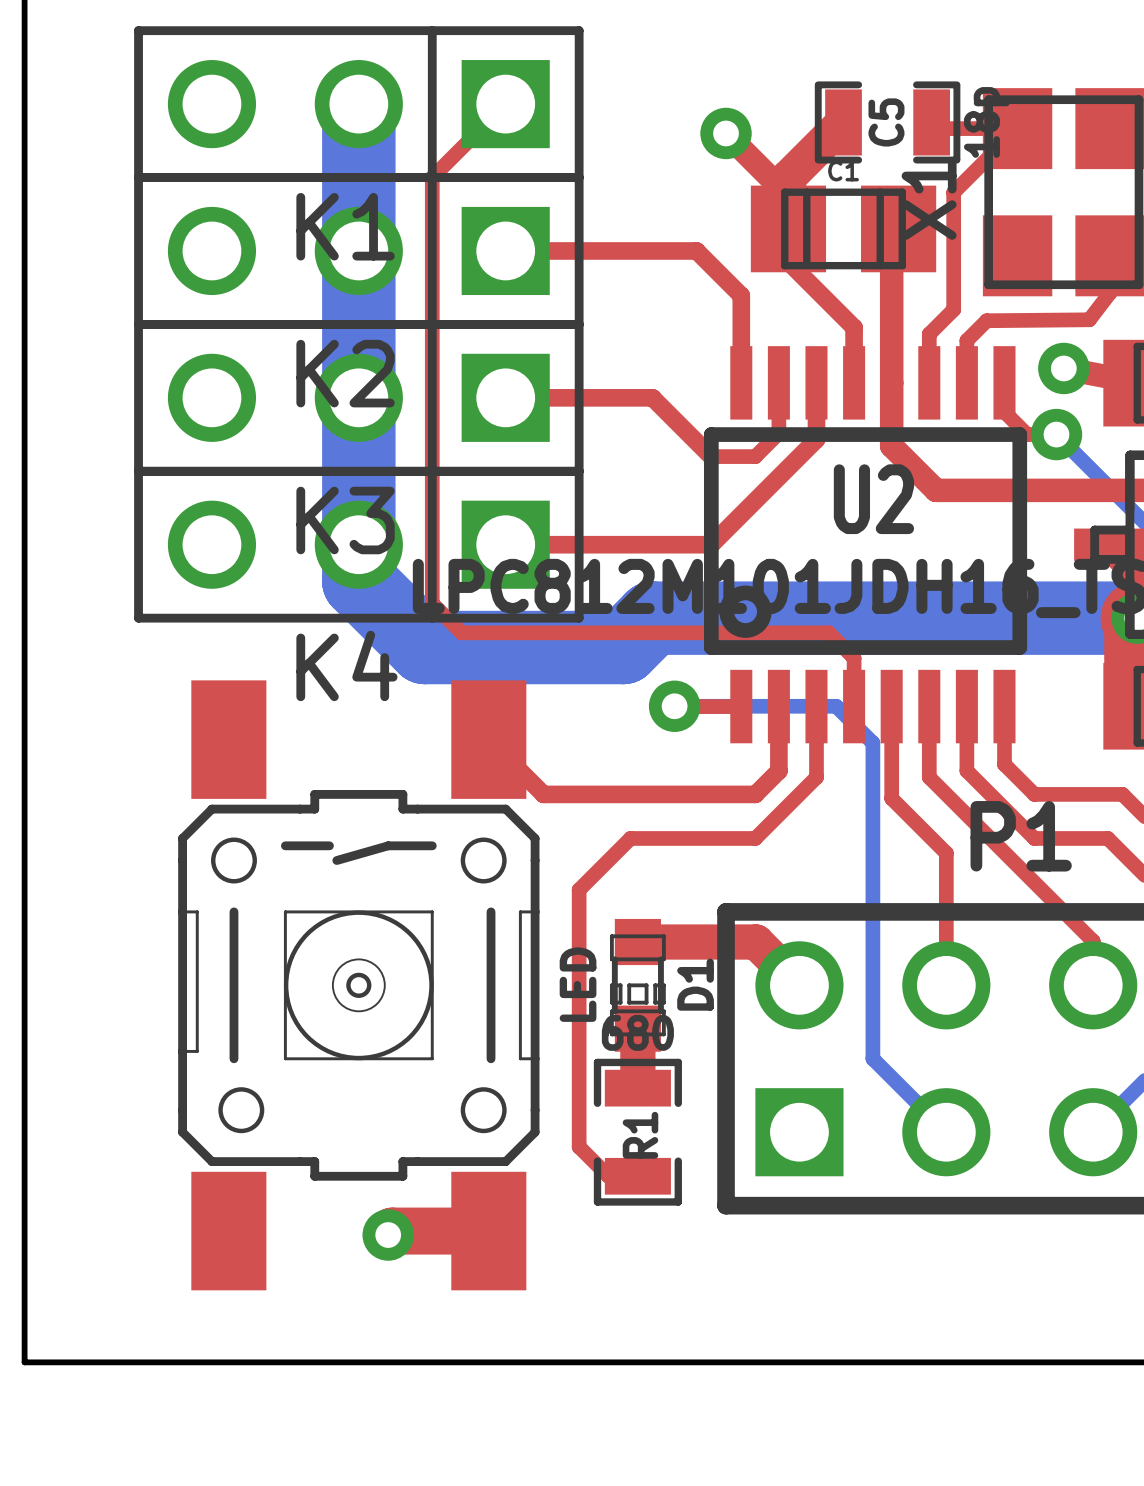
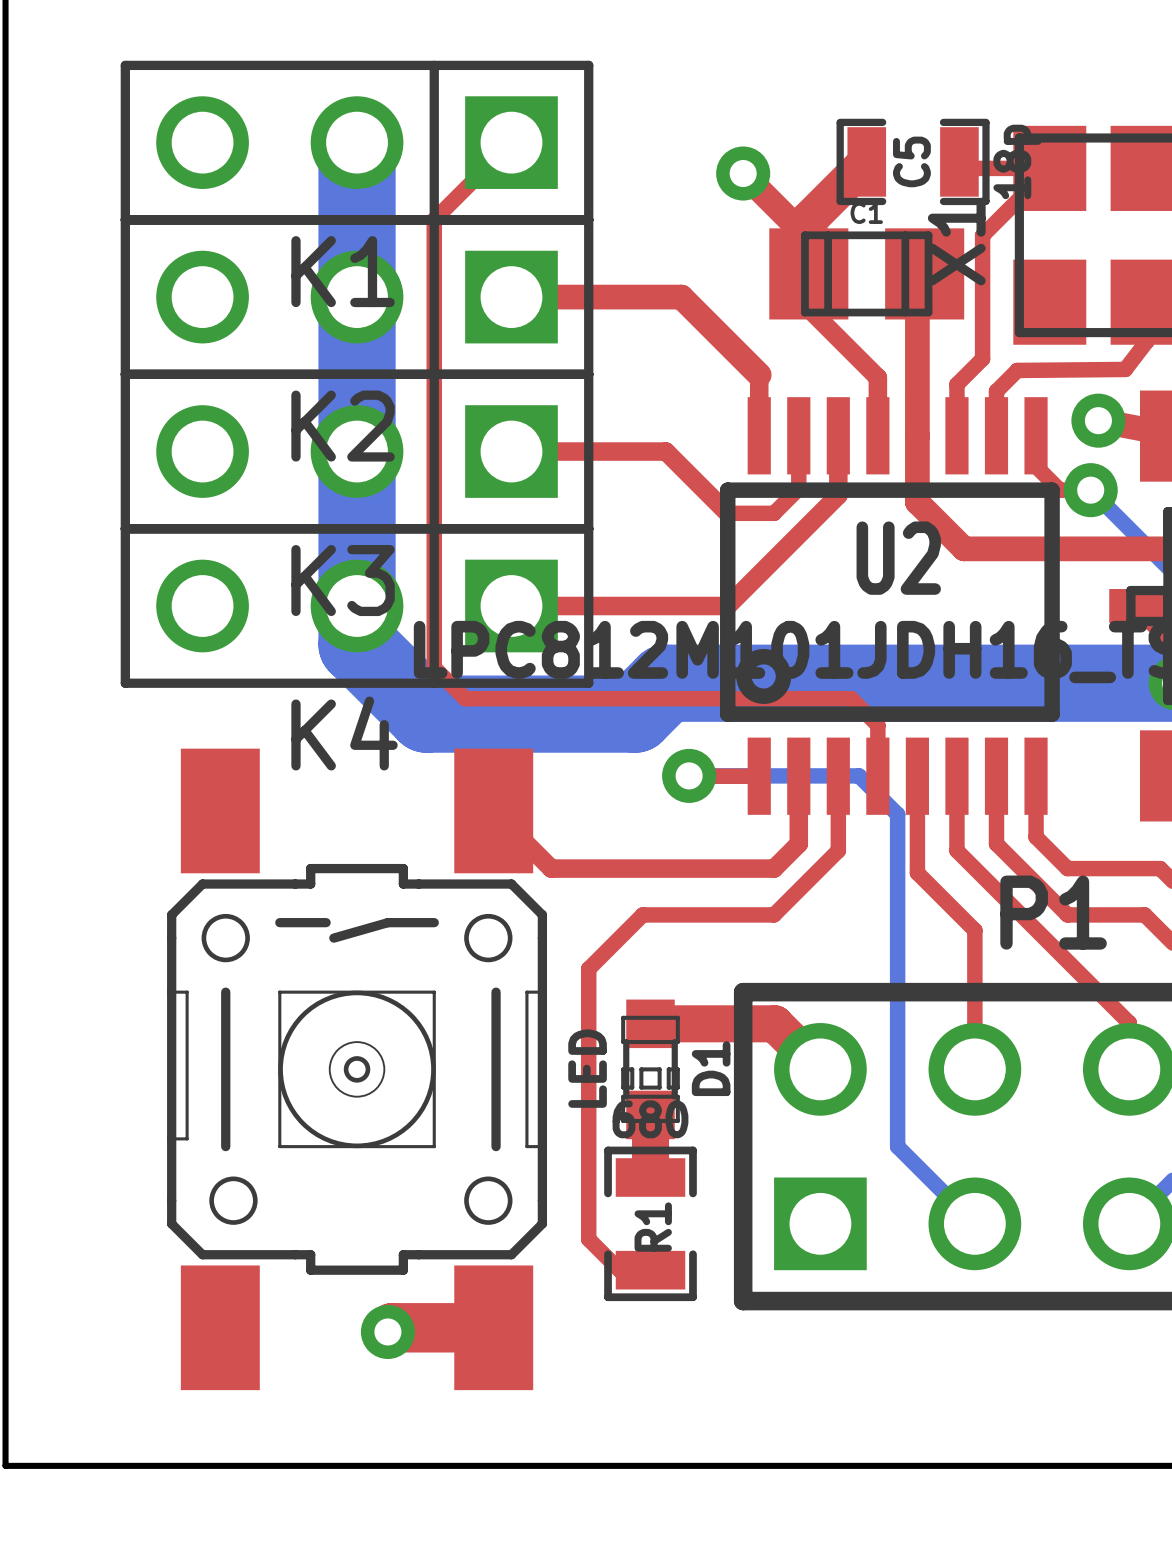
top track width: thin (505, 250) (667, 250) -> thick (511, 297) (681, 297)
top track: (667, 250) (696, 250) (741, 295) (741, 324) -> (681, 297) (759, 374)

